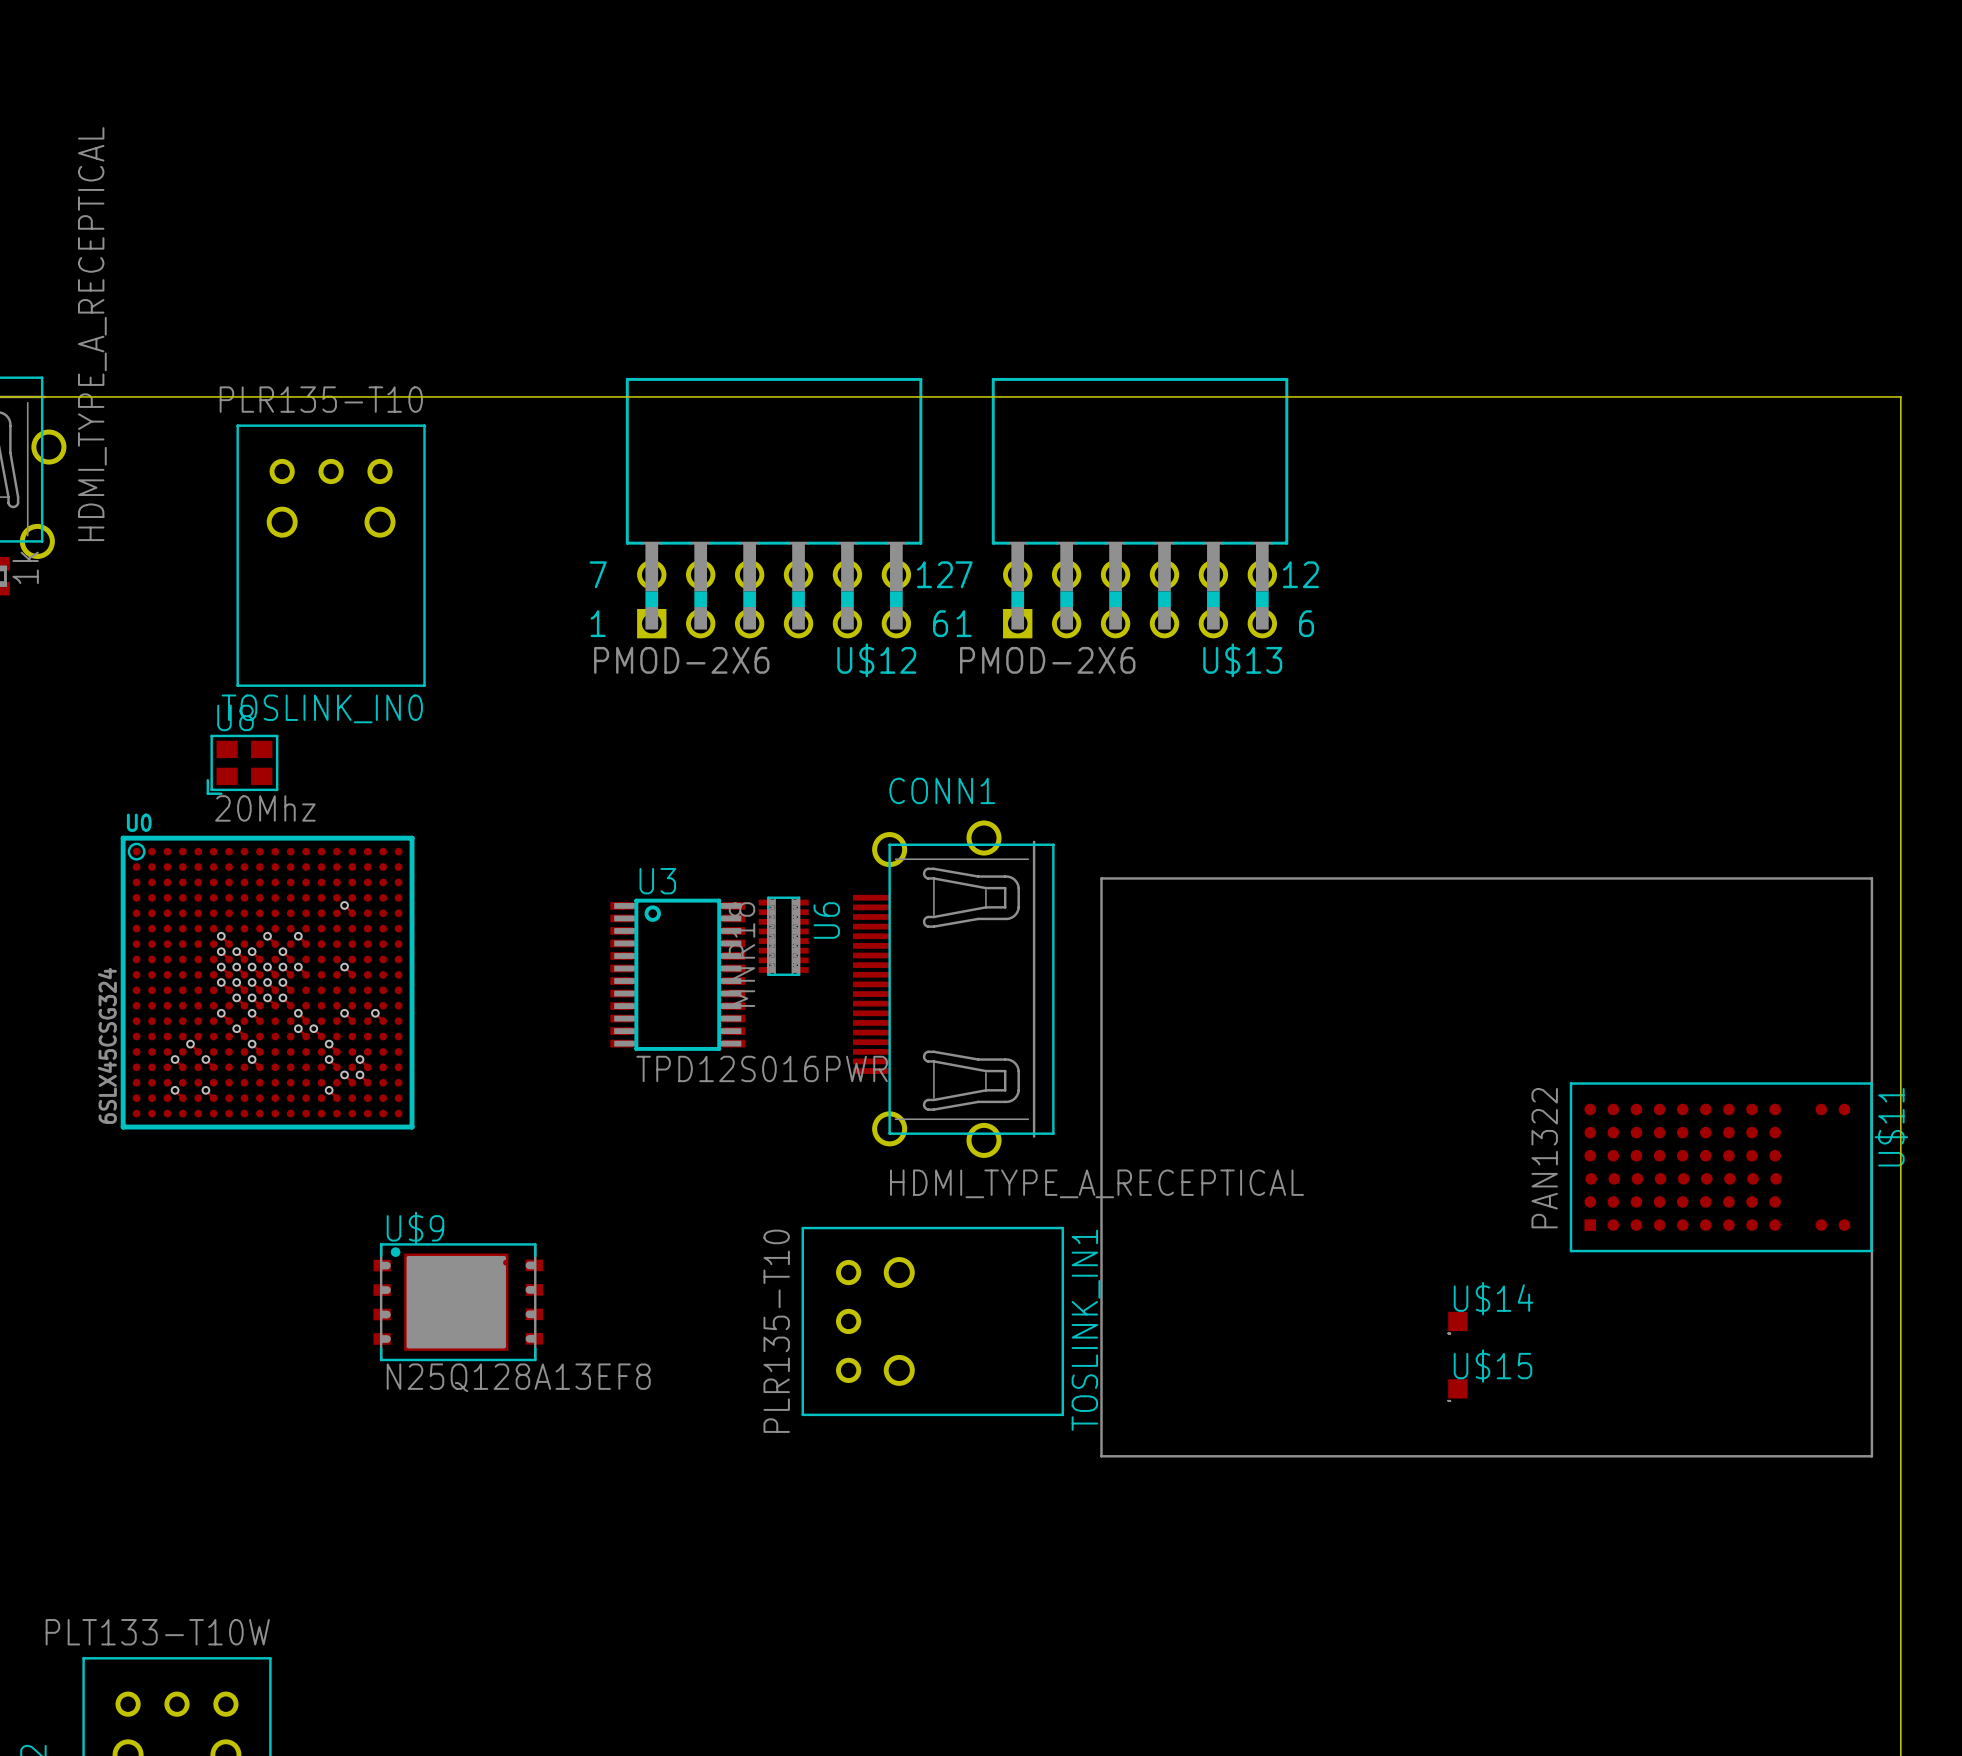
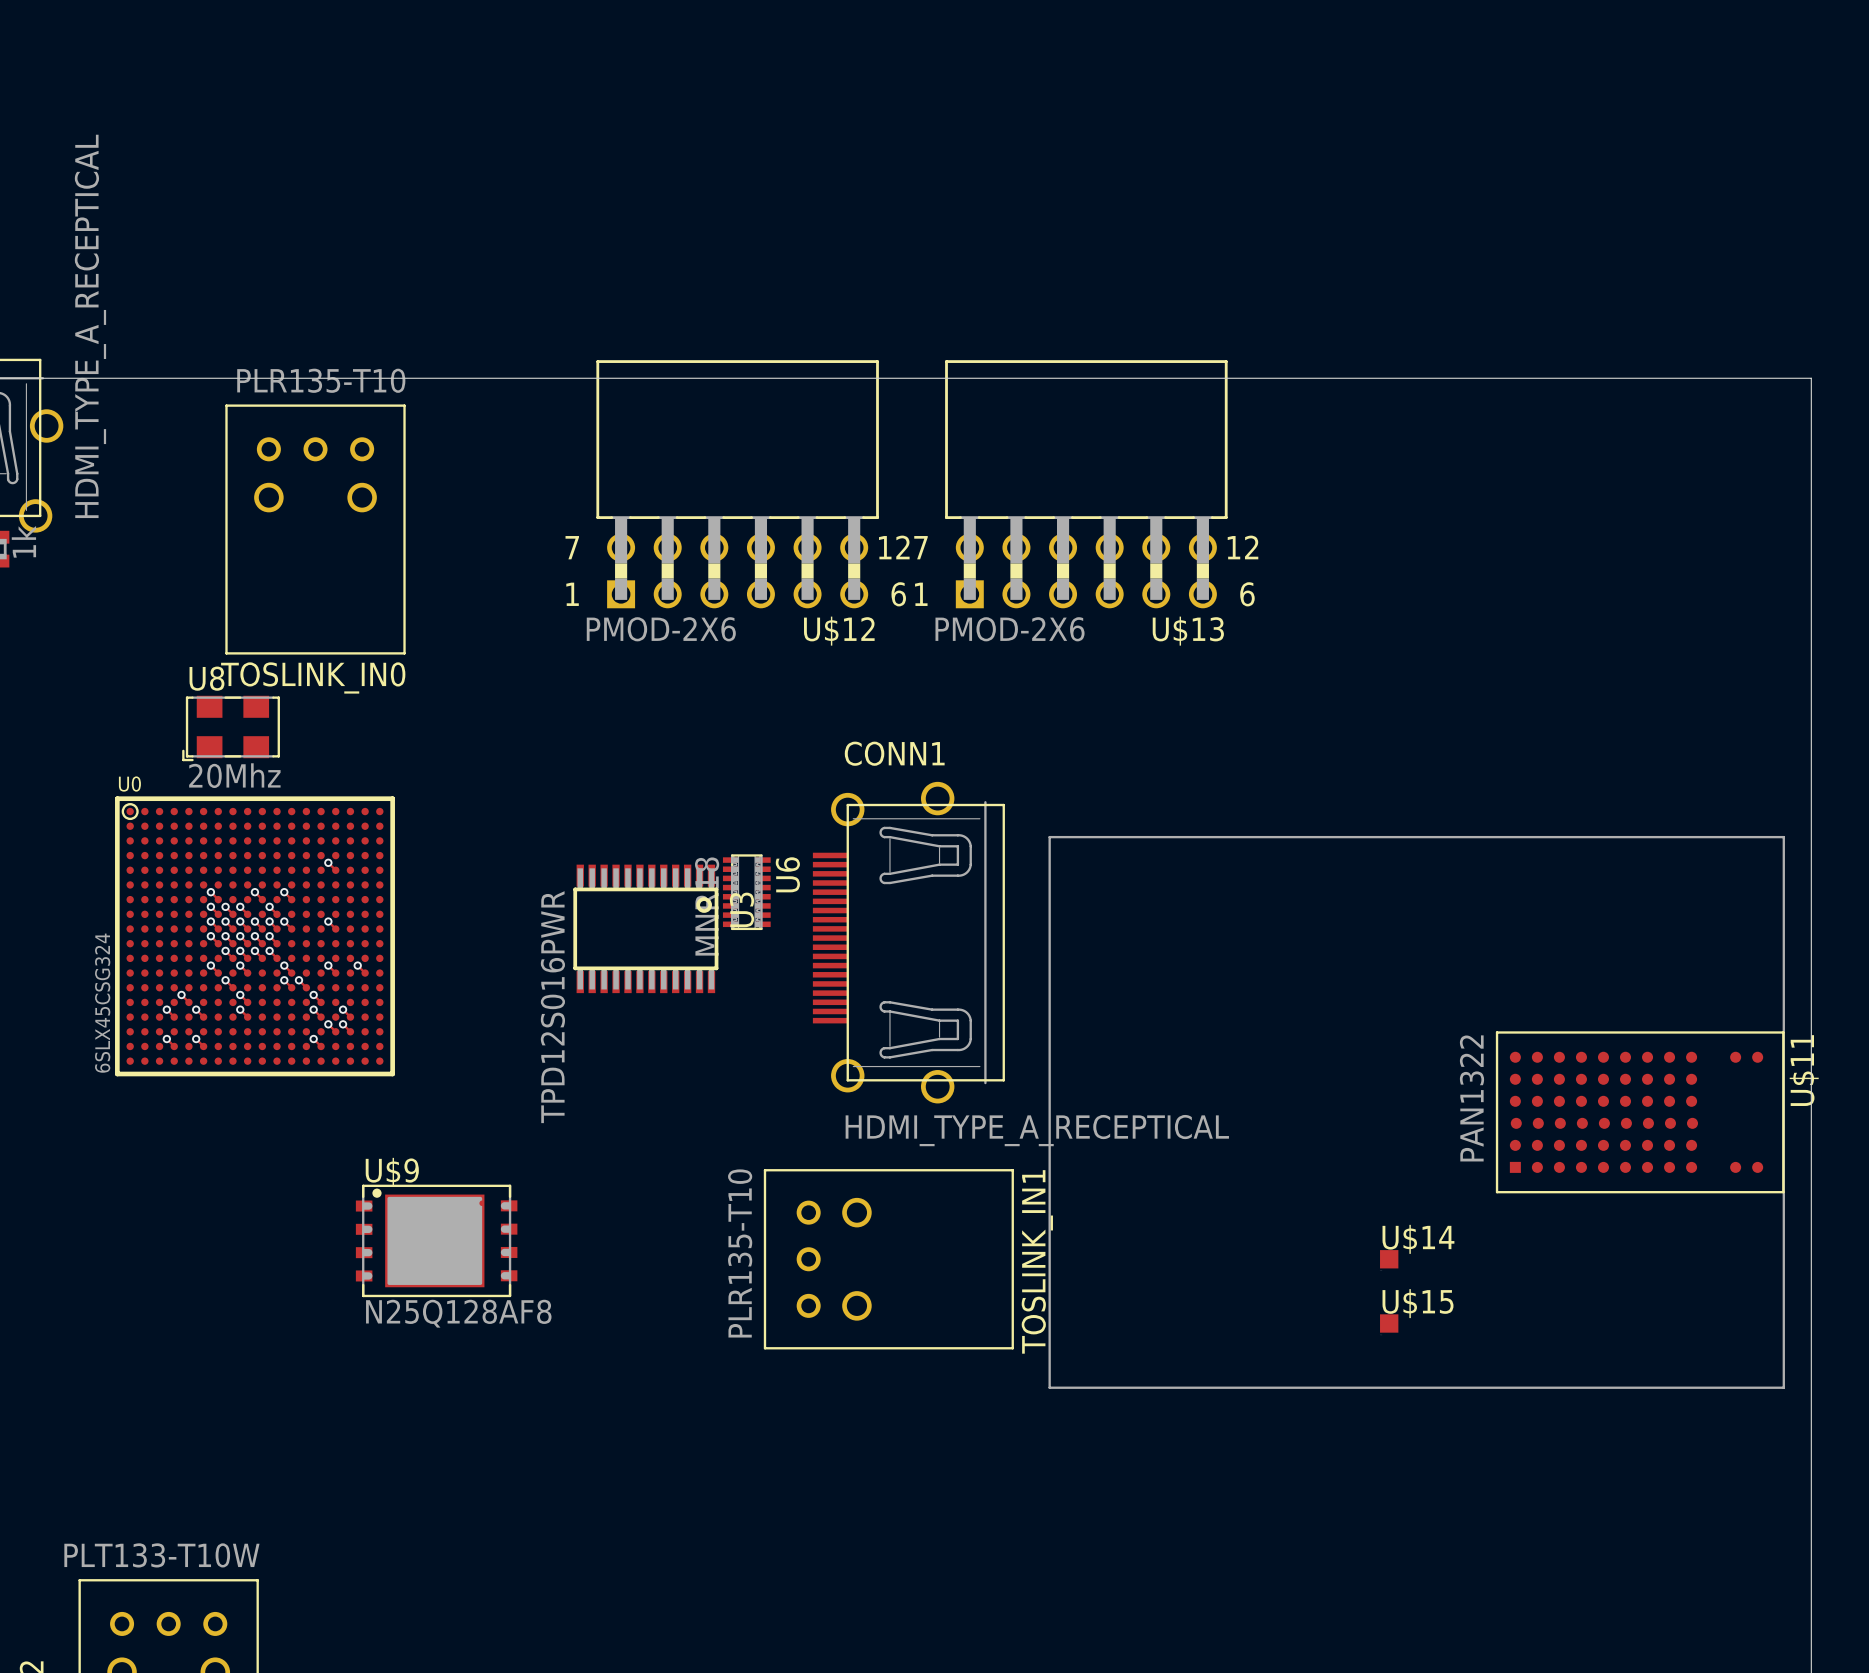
U8 footprint: [206, 734, 279, 795] -> [182, 695, 280, 762]
U3 rotation: 0° (677, 974) -> 90° clockwise (645, 928)
U$9 value: N25Q128A13EF8 (518, 1377) -> N25Q128AF8 (458, 1313)

